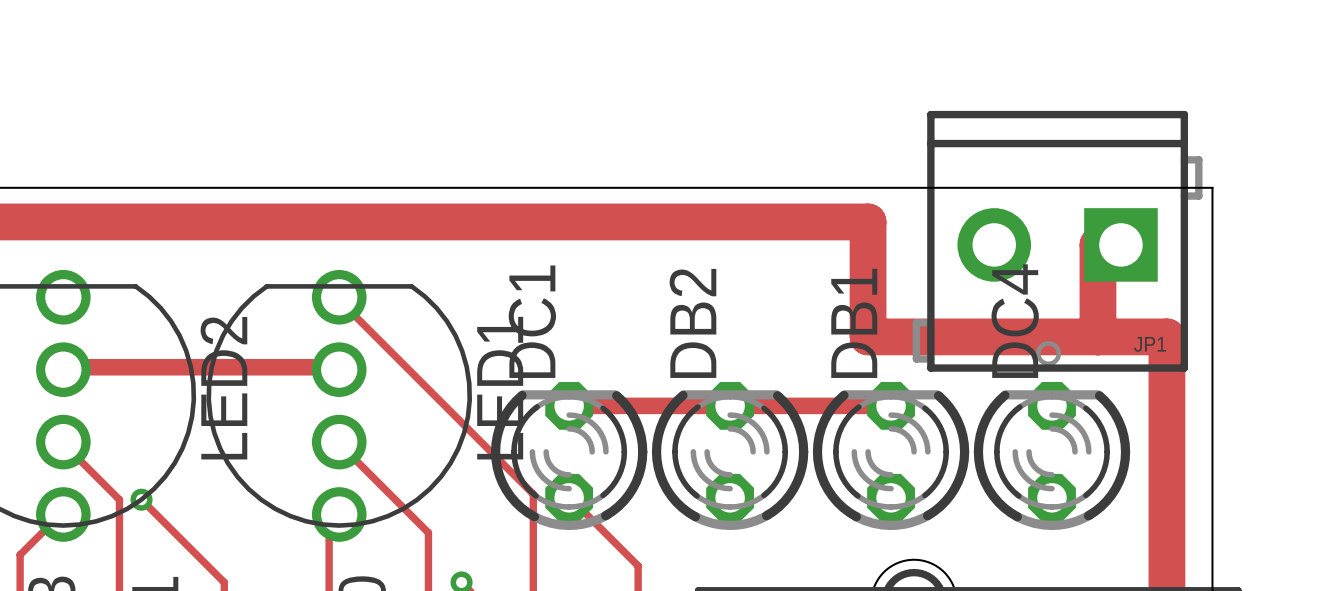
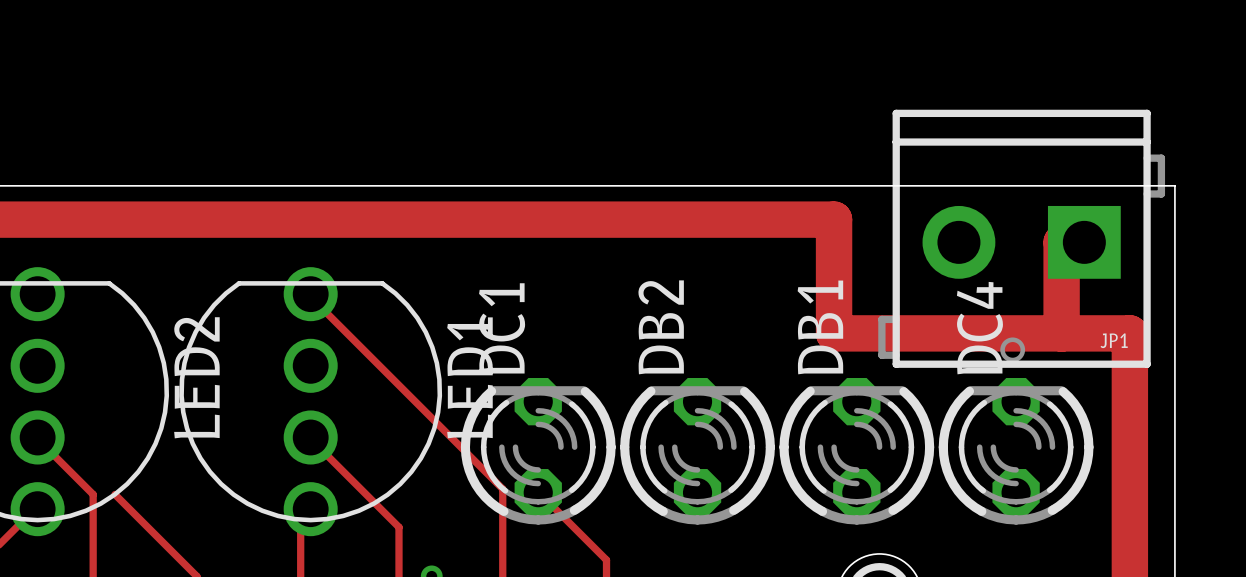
track: (63, 369) (64, 367) (334, 367) (339, 369) -> none
track: (569, 405) (891, 405) -> none
via: (141, 499) -> none

